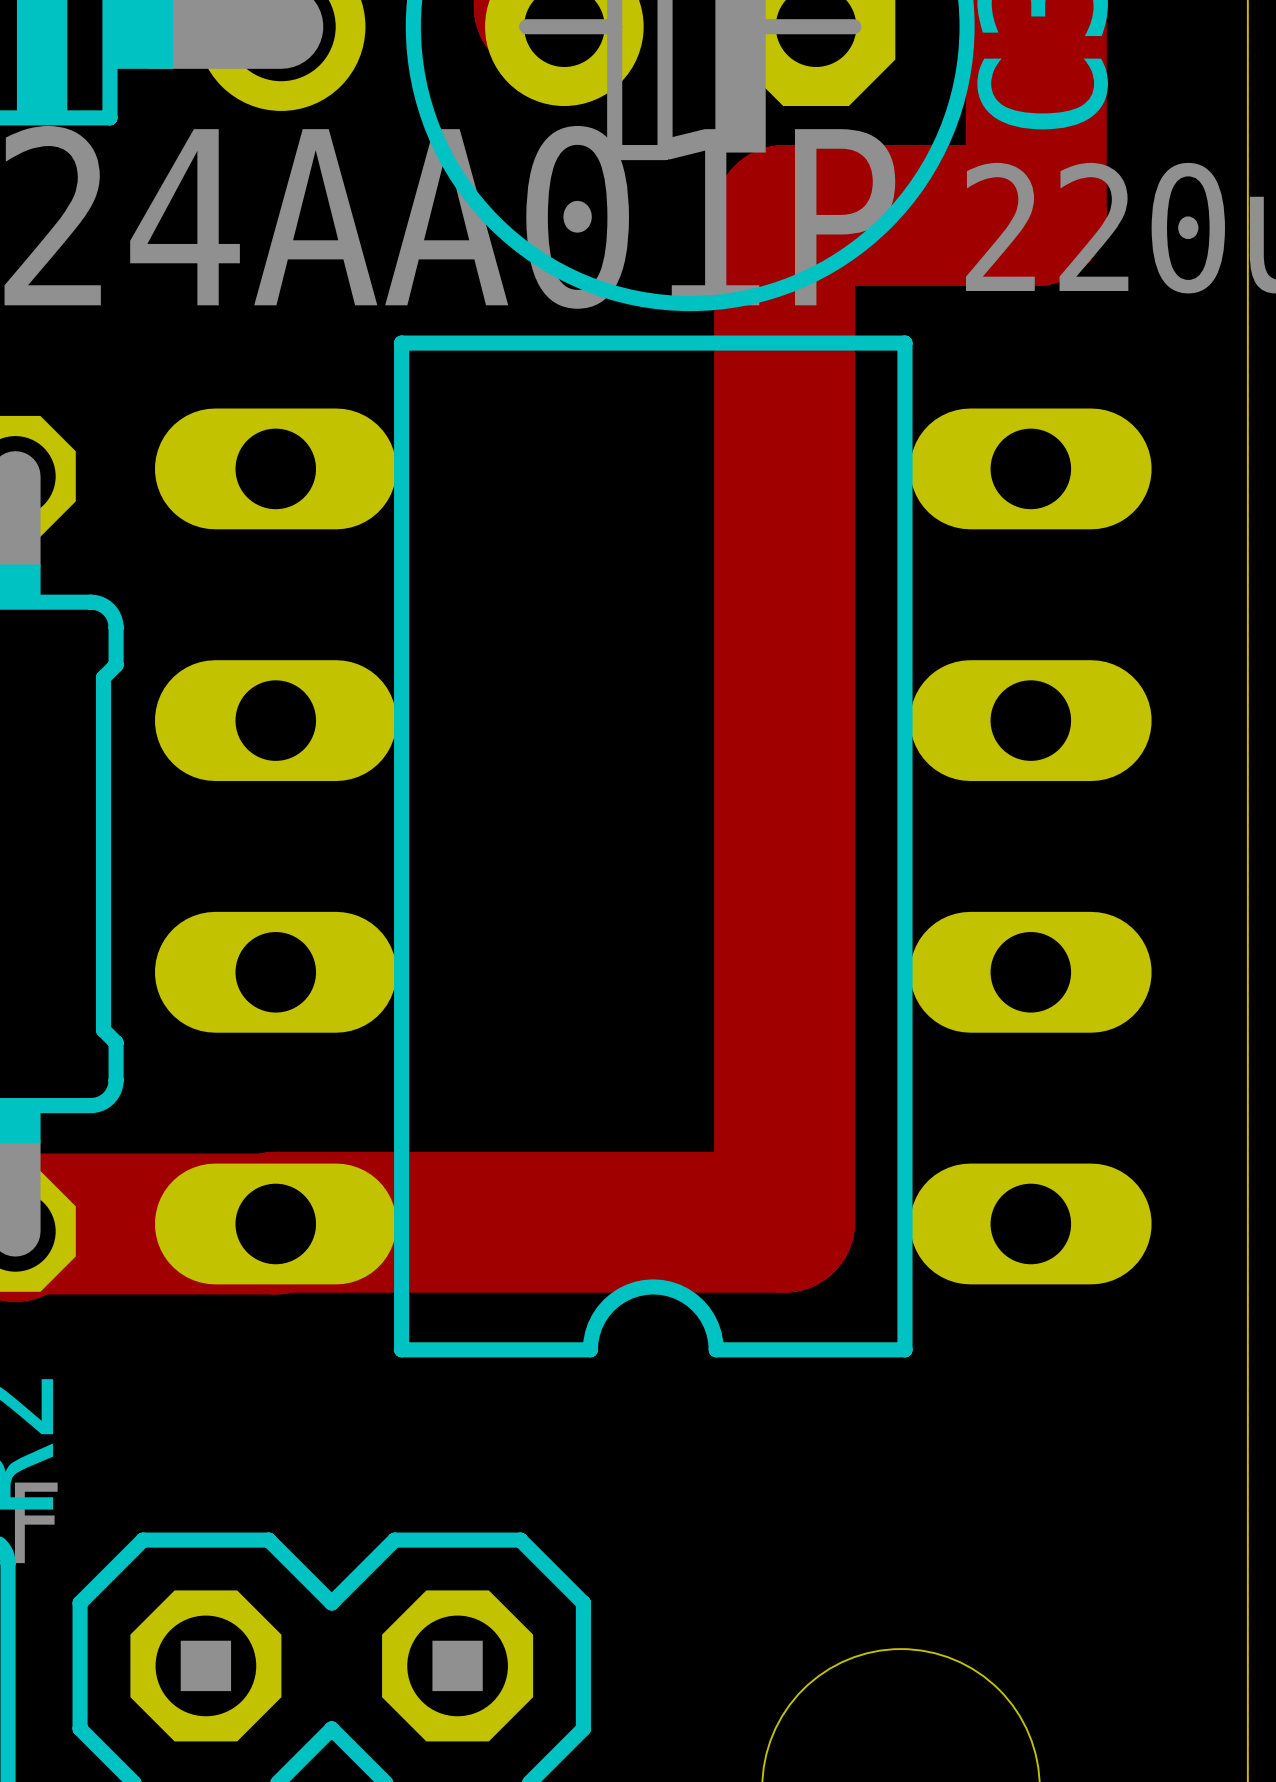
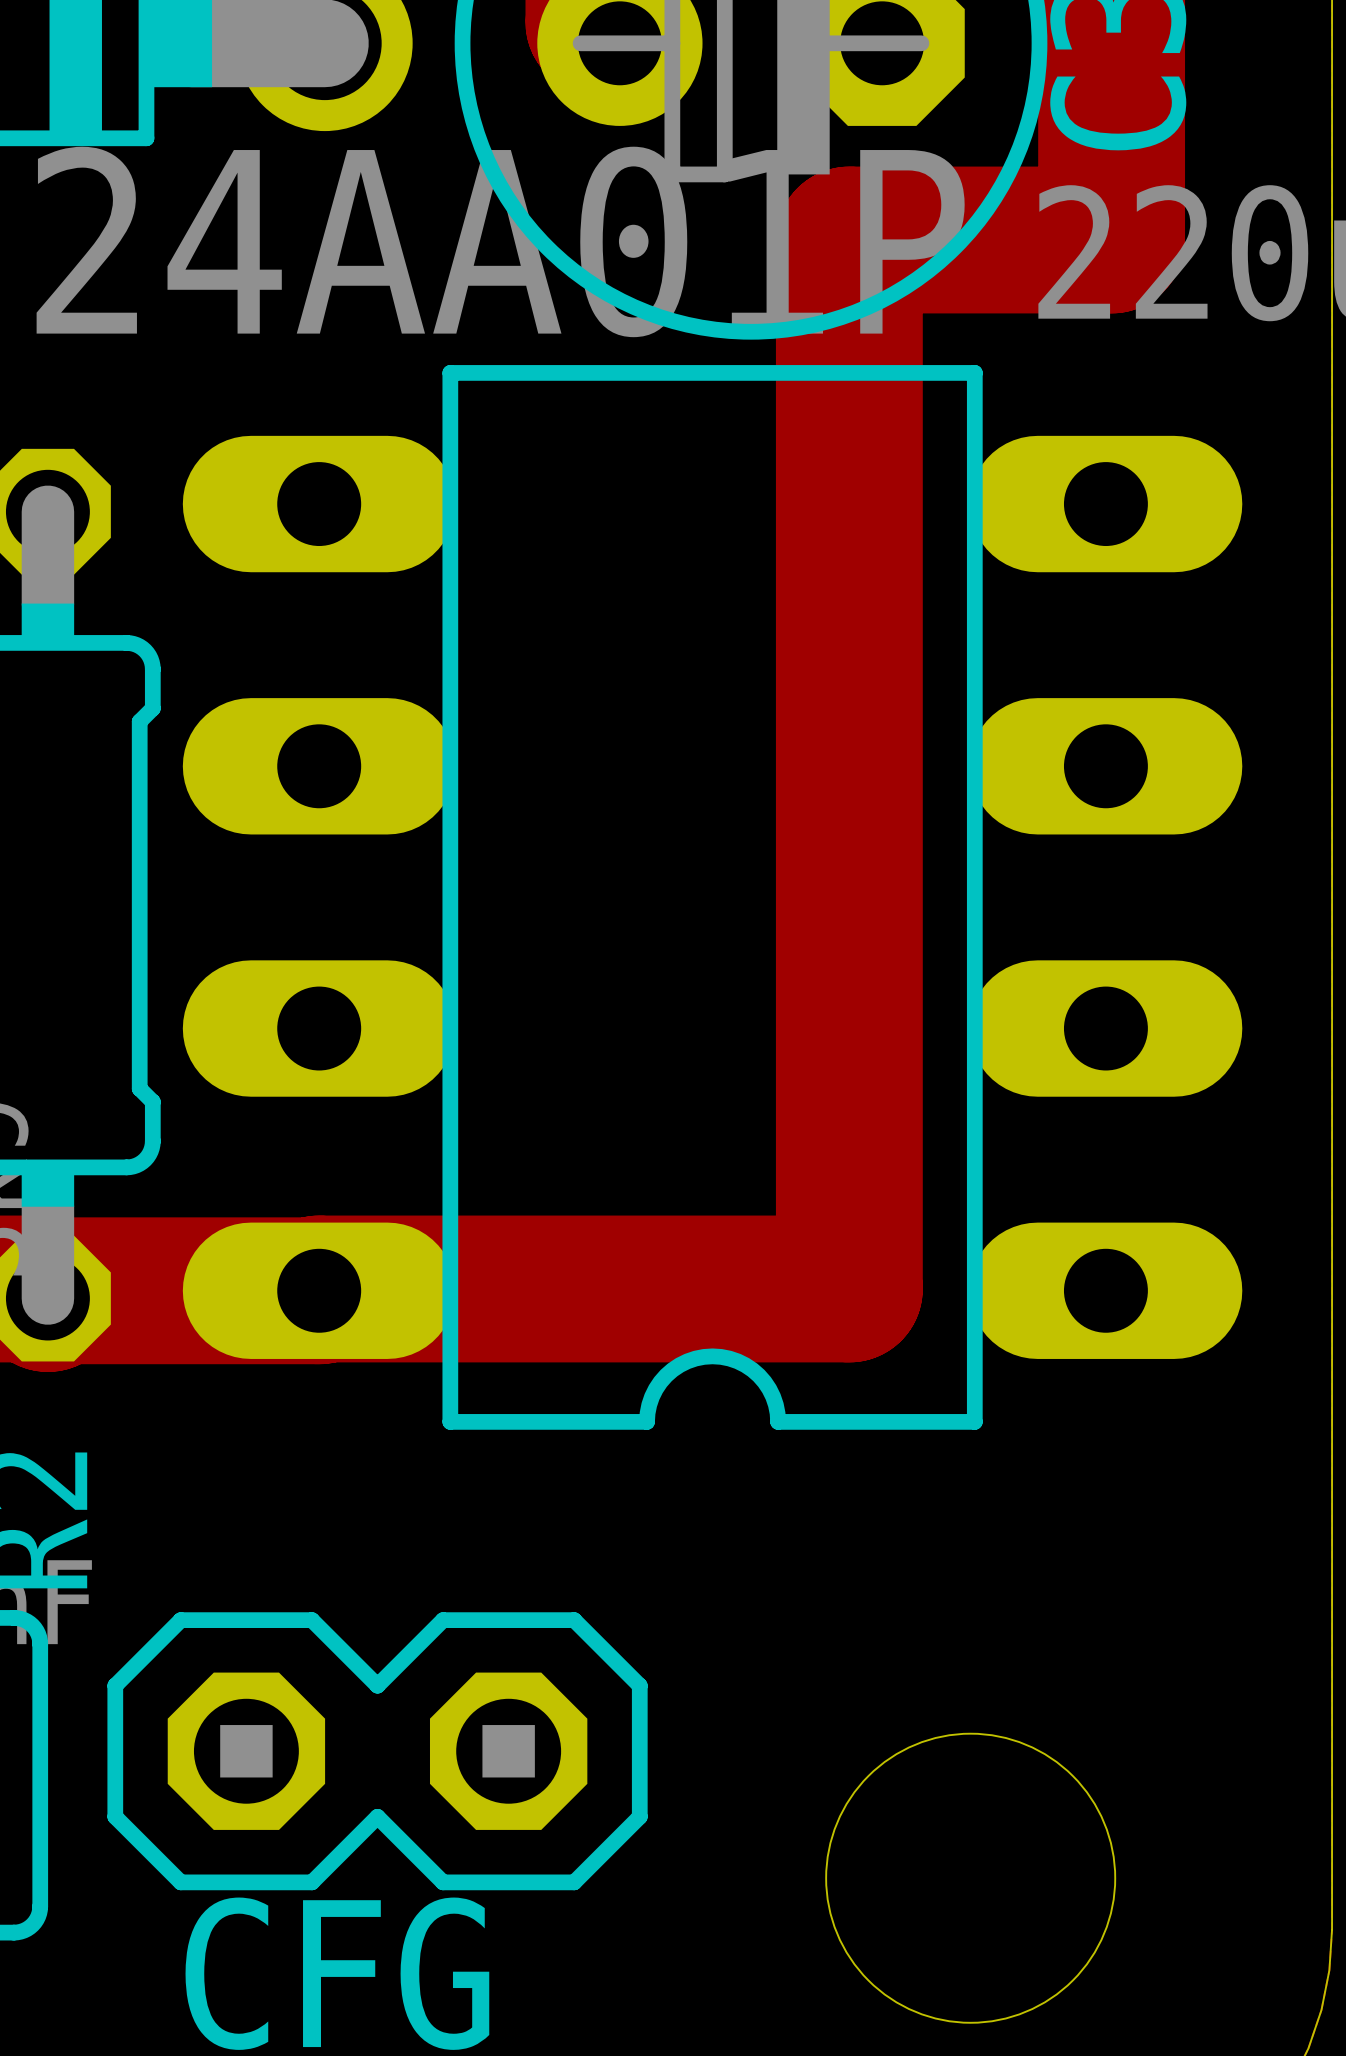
part footprint: [154, 335, 1152, 1358] -> [182, 365, 1243, 1430]

